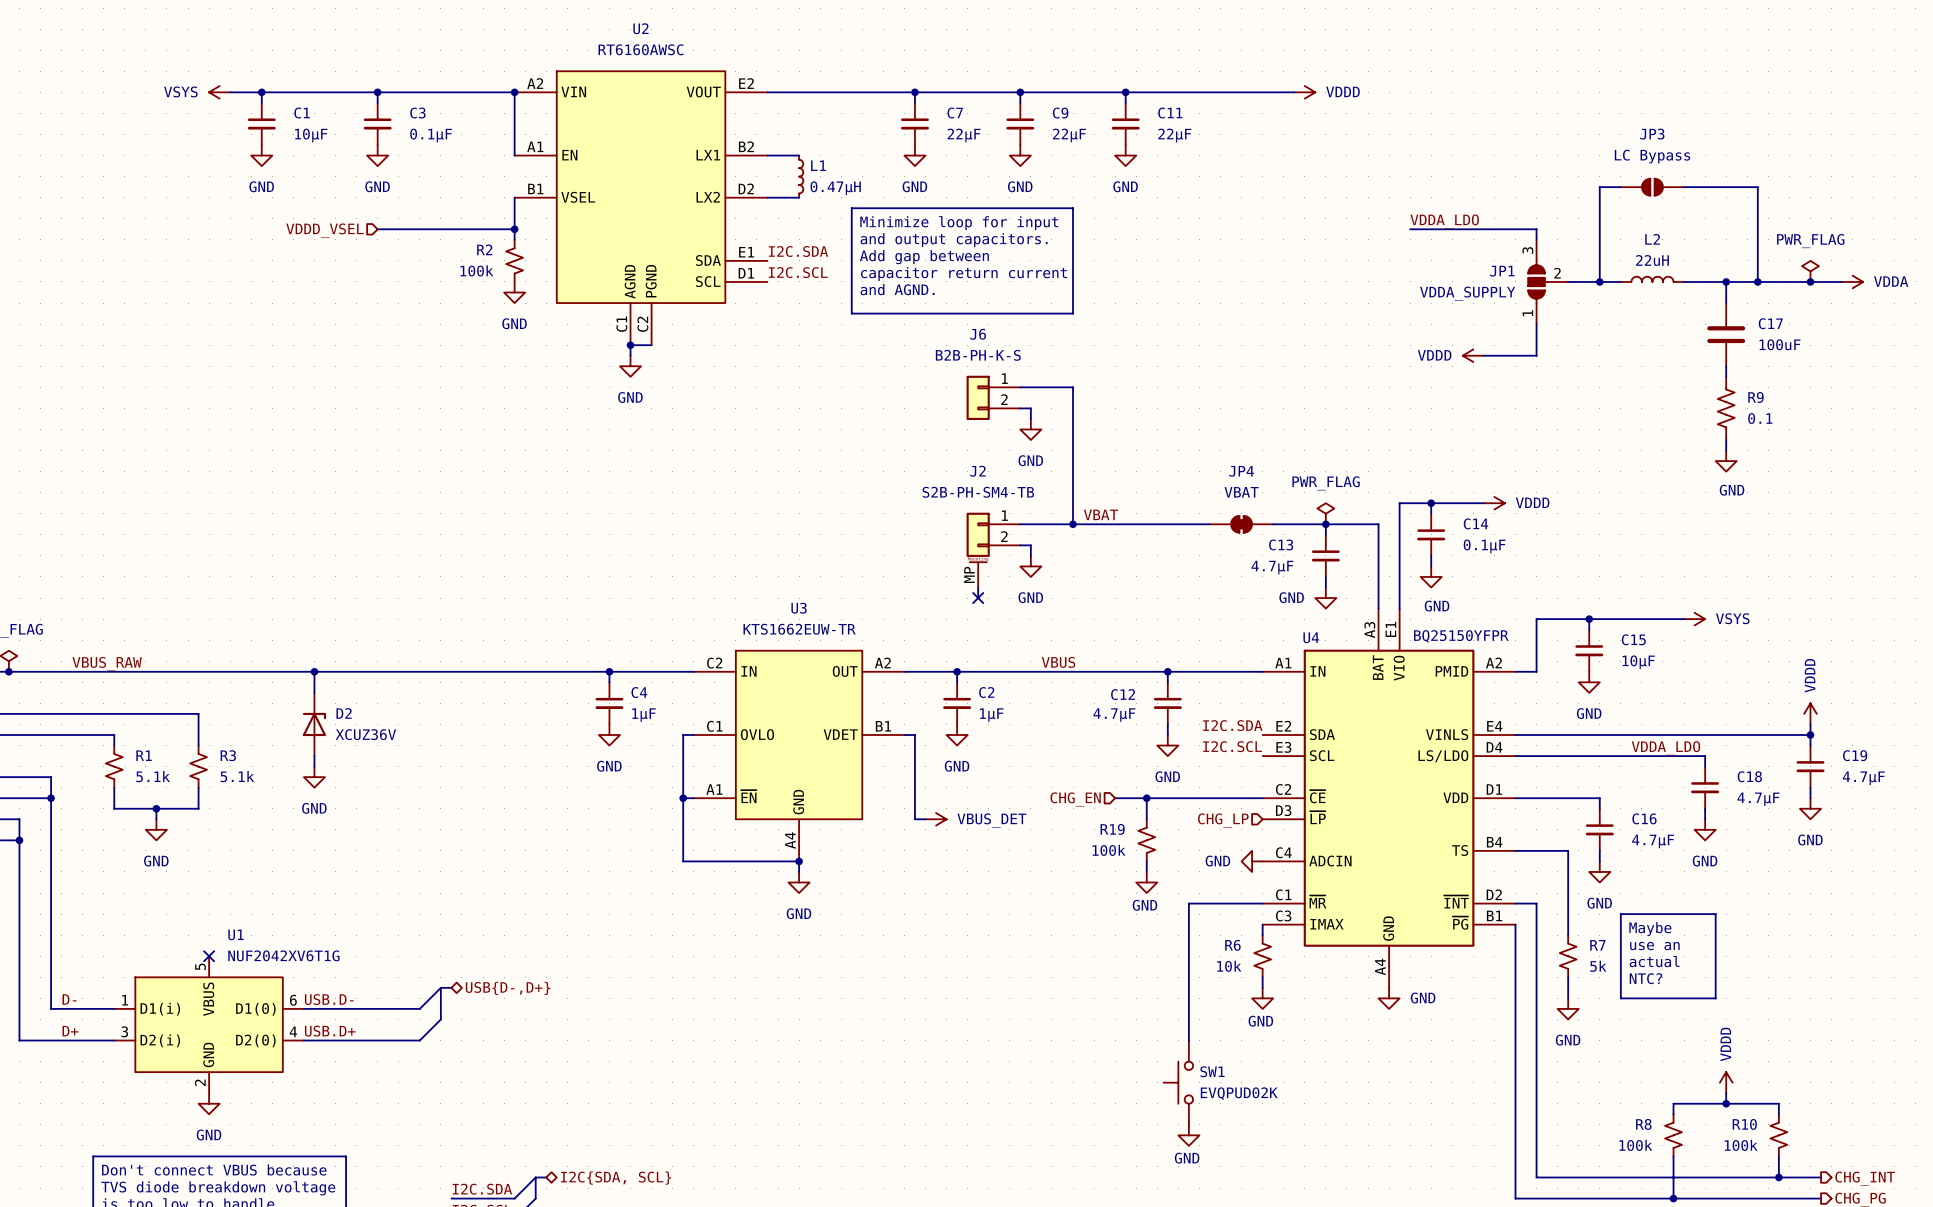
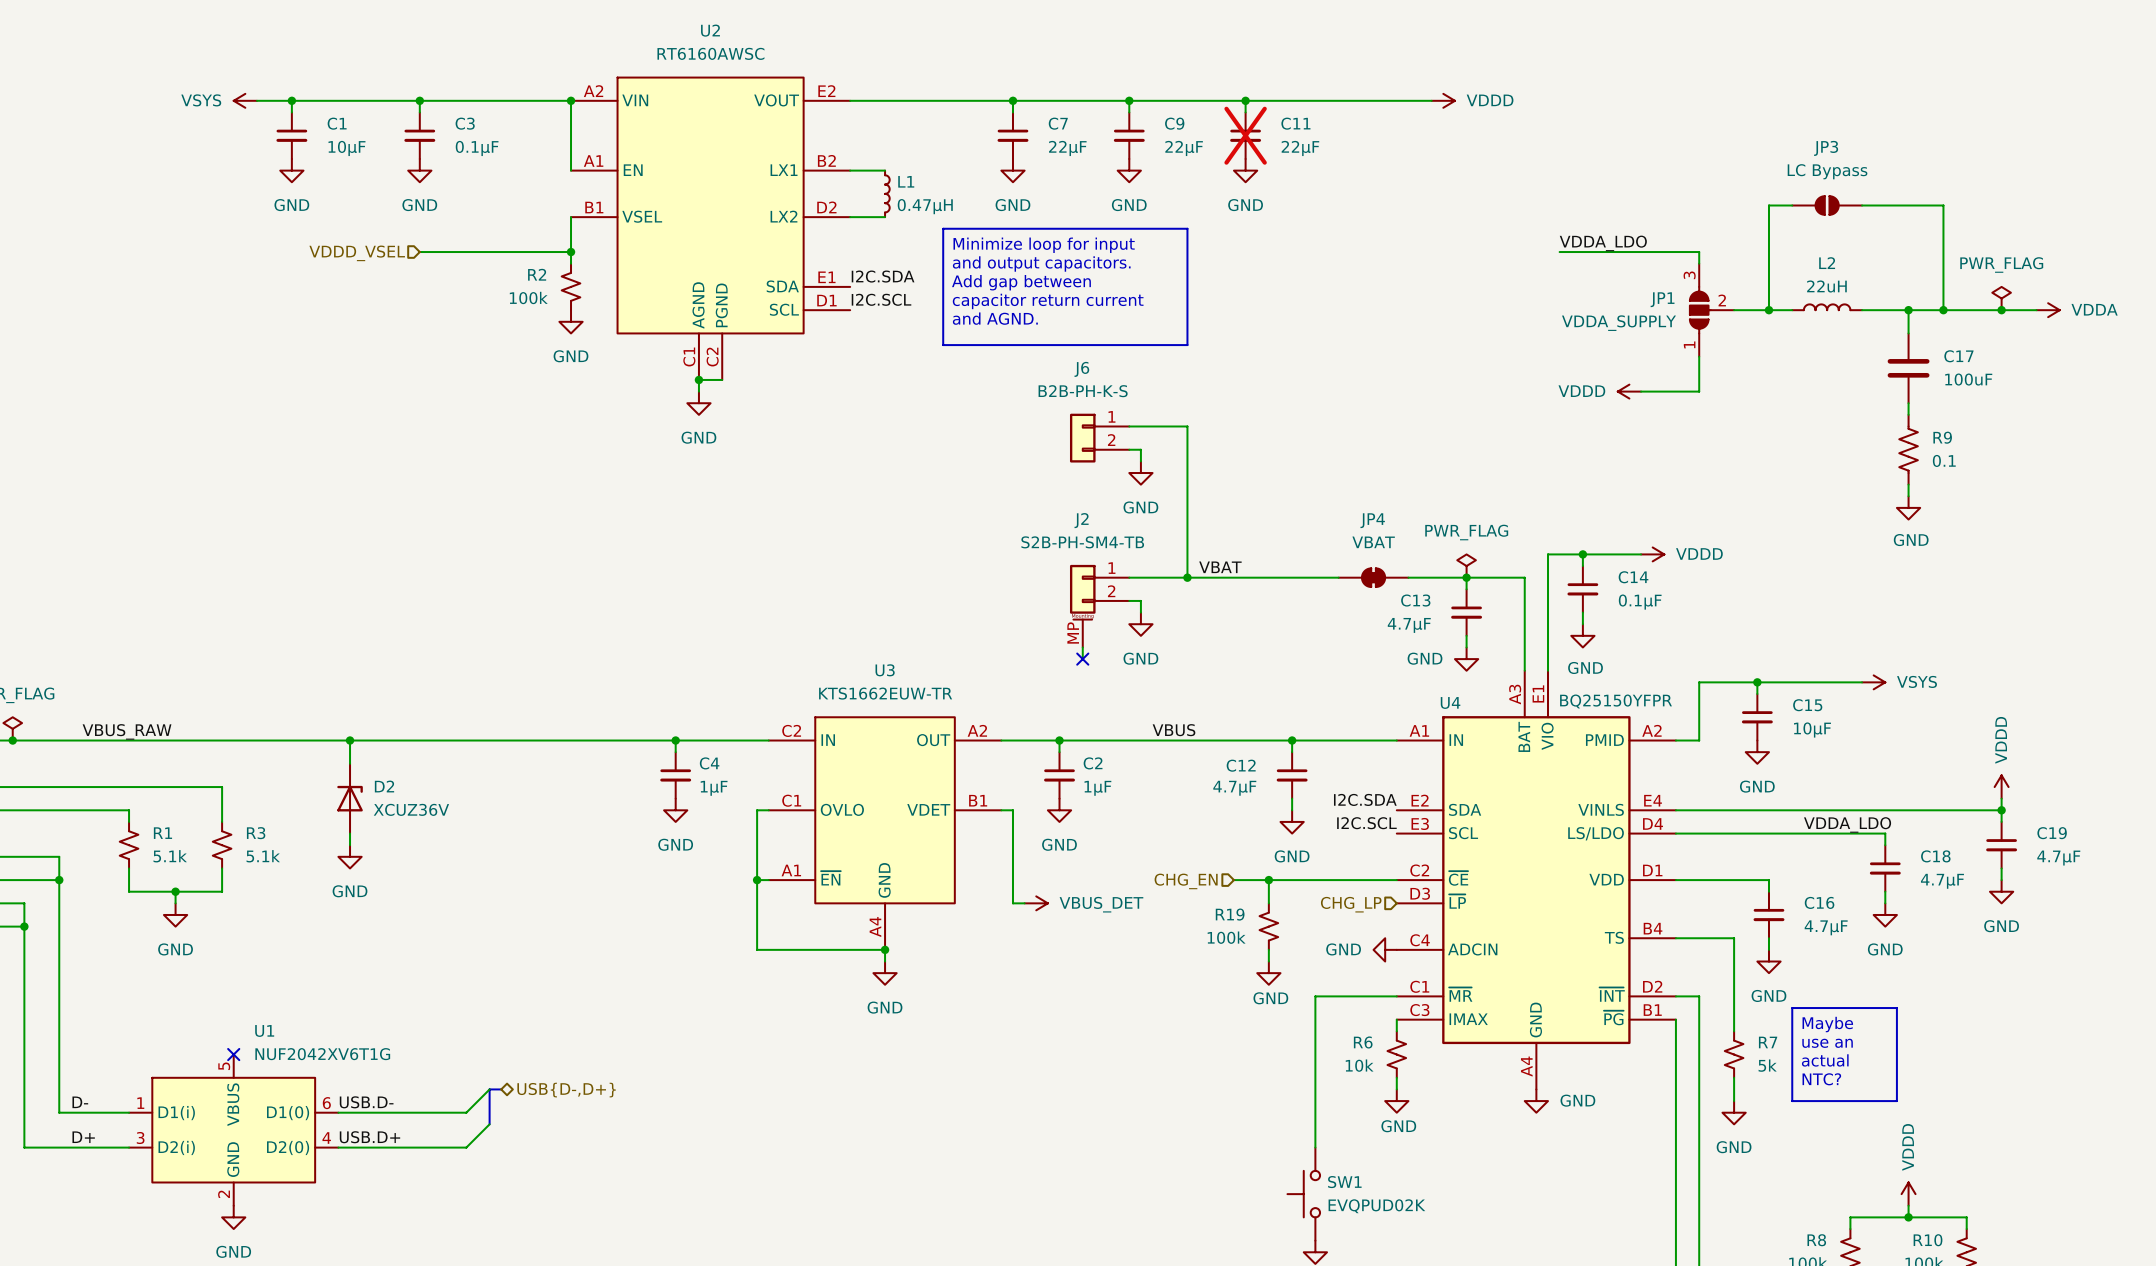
C11 do-not-place cross: none -> (1245, 135)

